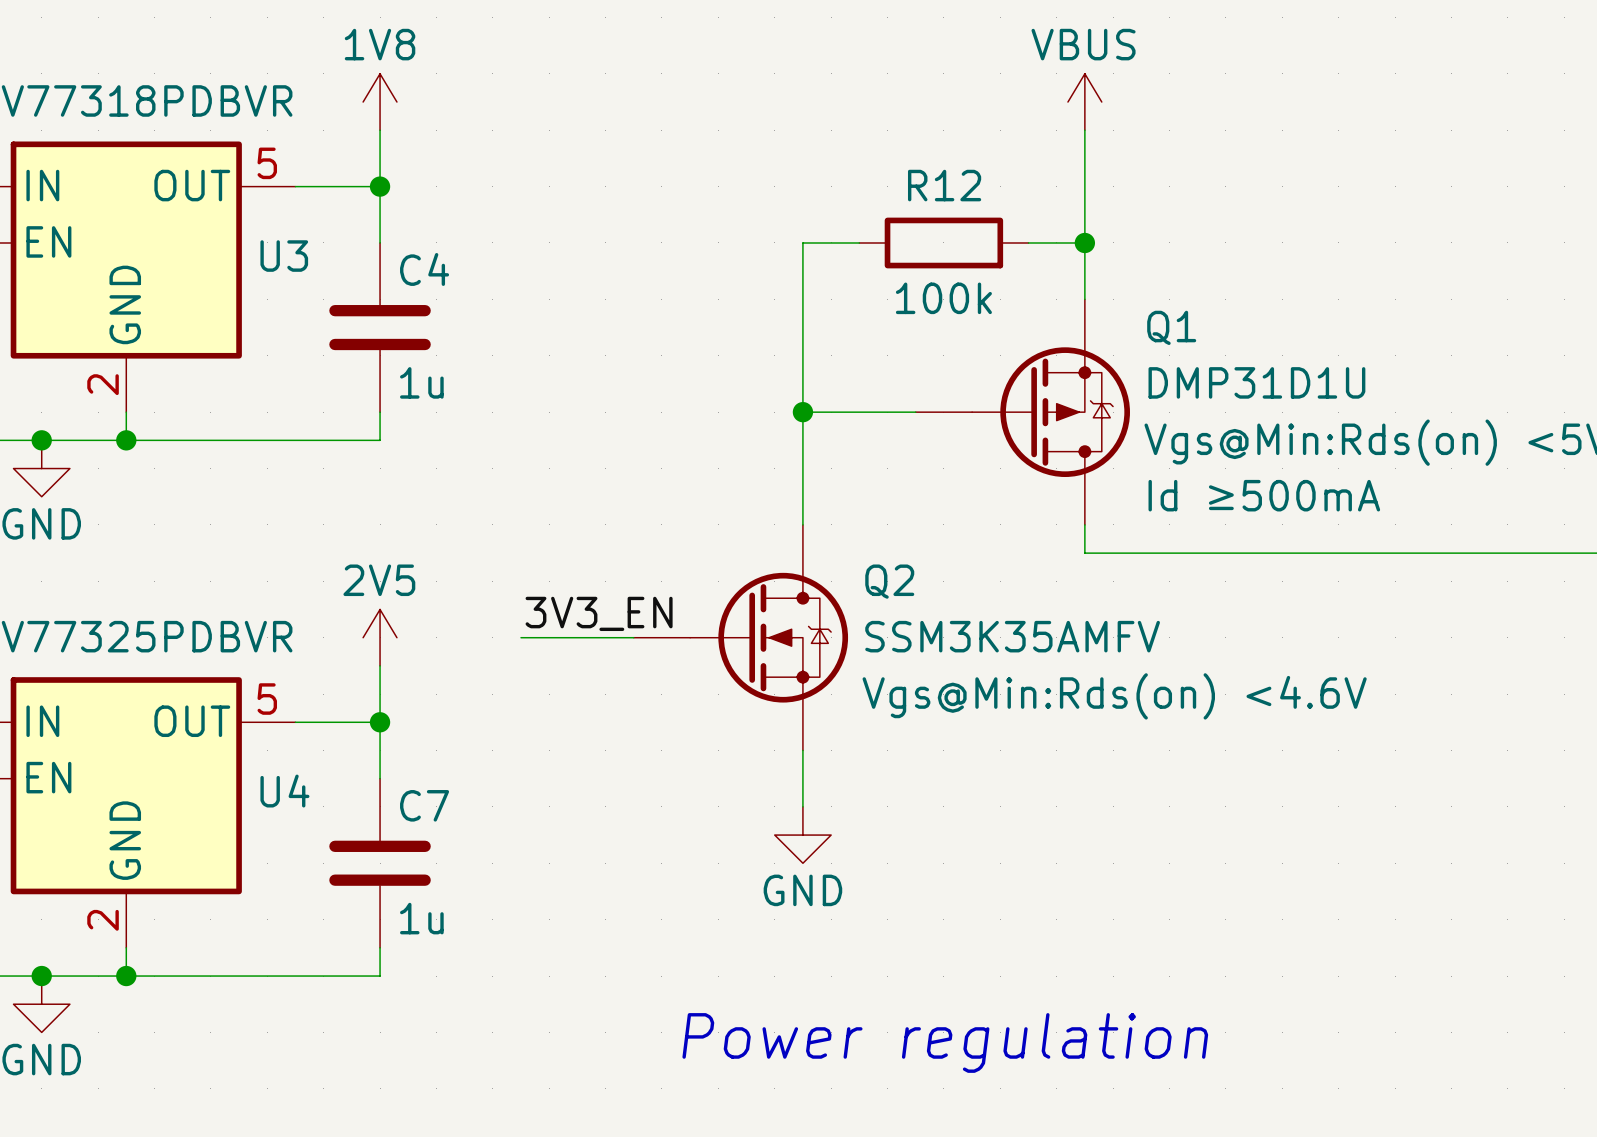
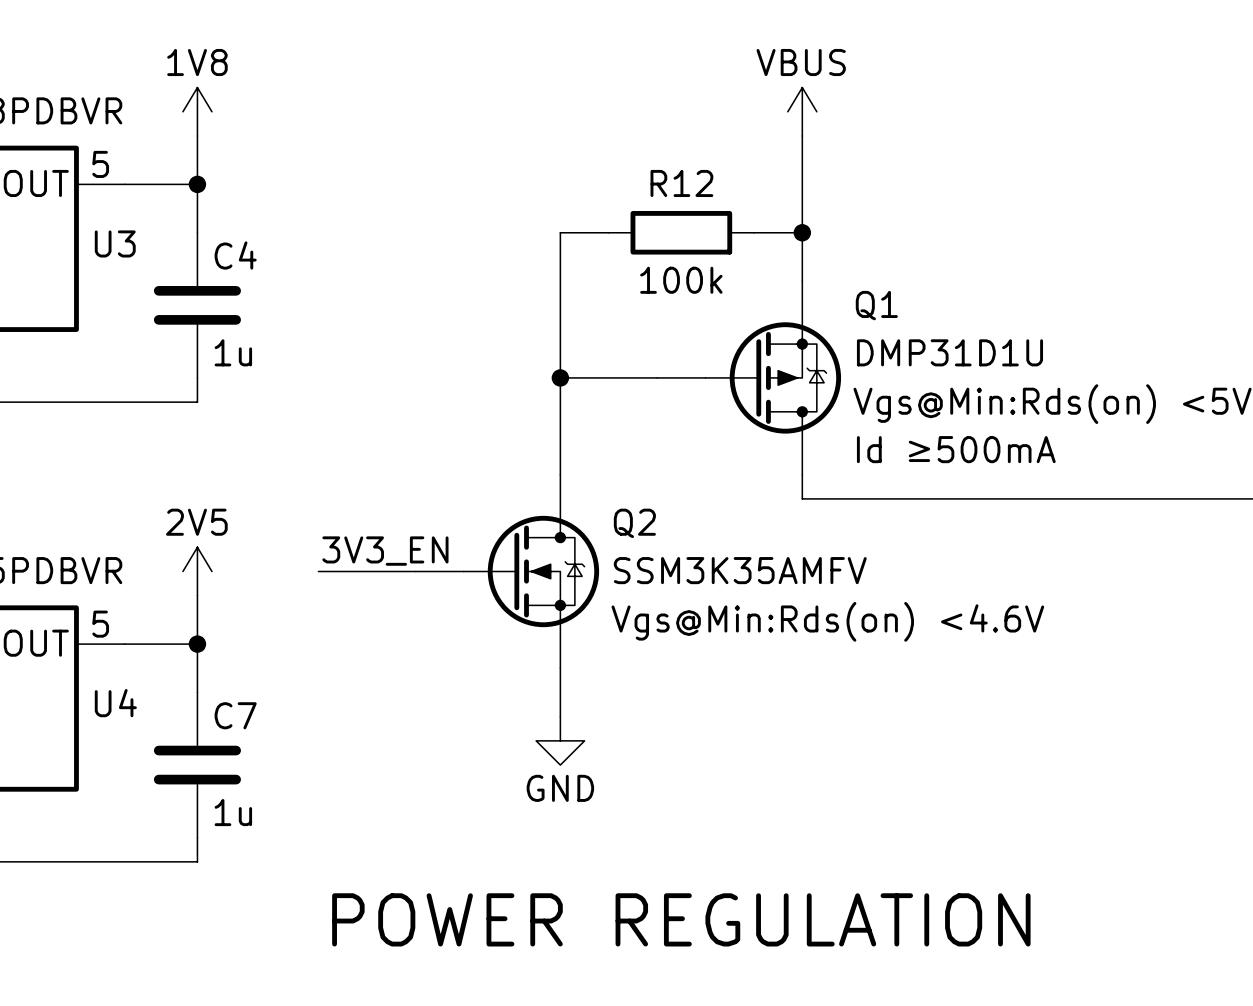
text: Power regulation (945, 1042) -> POWER REGULATION (681, 919)

